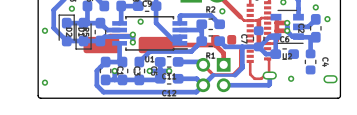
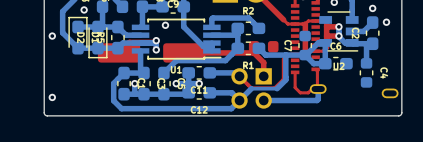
via: (222, 11) -> none
via: (291, 78) -> none

